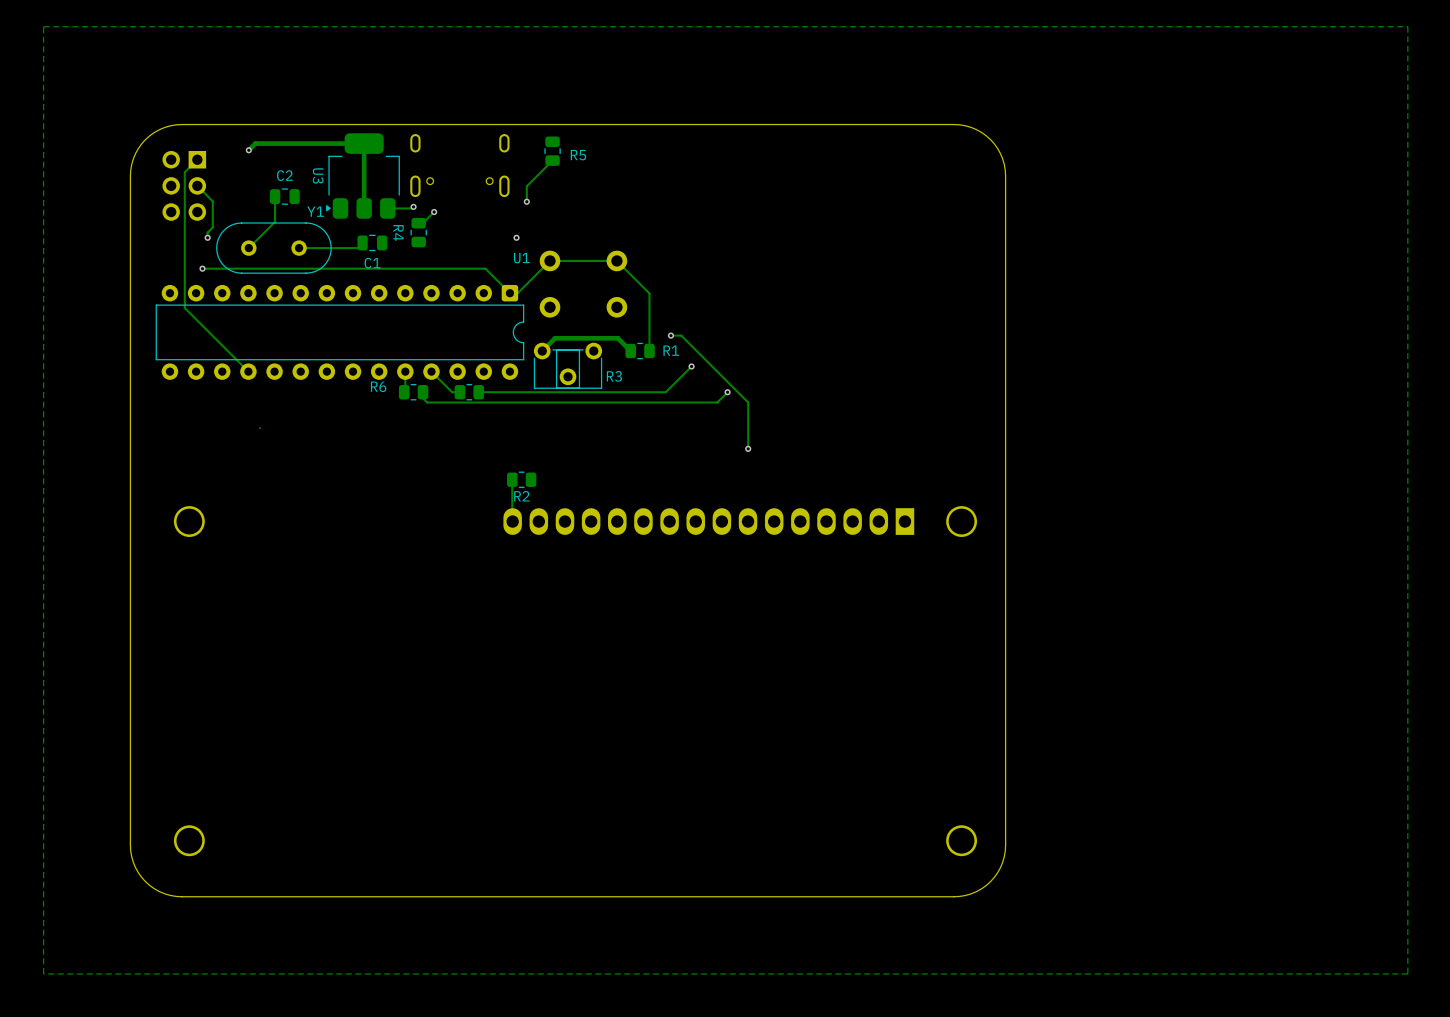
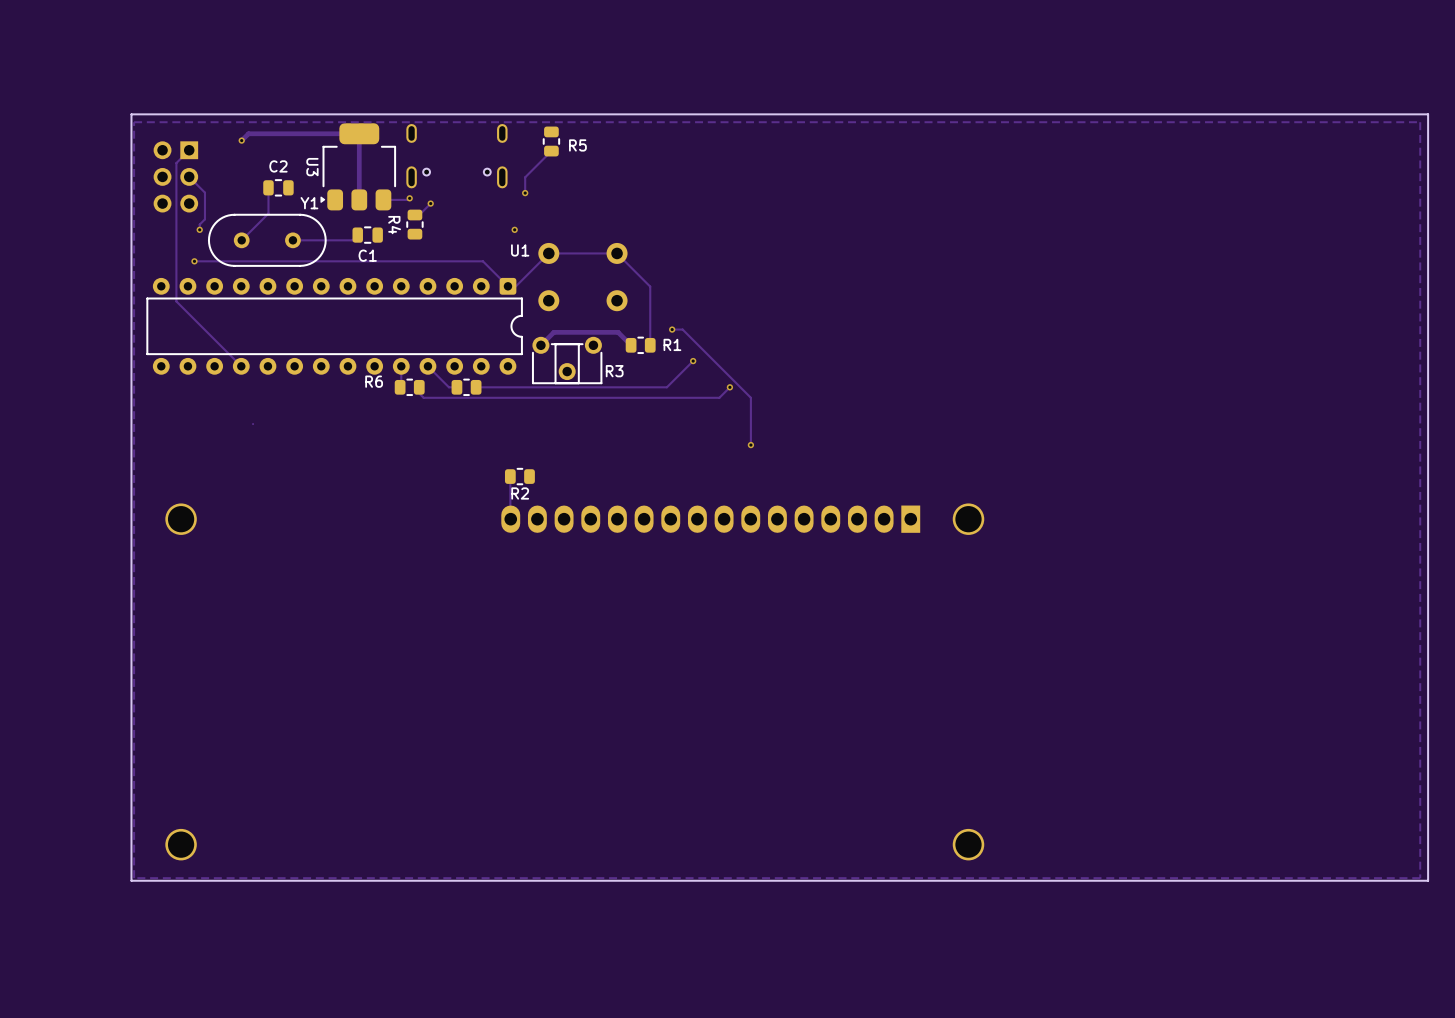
zone outline: (1407, 26) (1407, 973) (43, 973) (43, 26) (1407, 26) -> (1420, 122) (1420, 878) (134, 878) (134, 122) (1420, 122)
board edge: (954, 124) (971, 127) (990, 139) (1002, 159) (1005, 176) (1005, 851) (997, 872) (986, 885) (971, 893) (954, 896) (181, 896) (164, 893) (145, 881) (133, 862) (130, 845) (130, 176) (133, 159) (145, 139) (164, 127) (181, 124) -> (960, 114) (1428, 114) (1428, 880) (131, 880) (131, 114) (173, 114)

